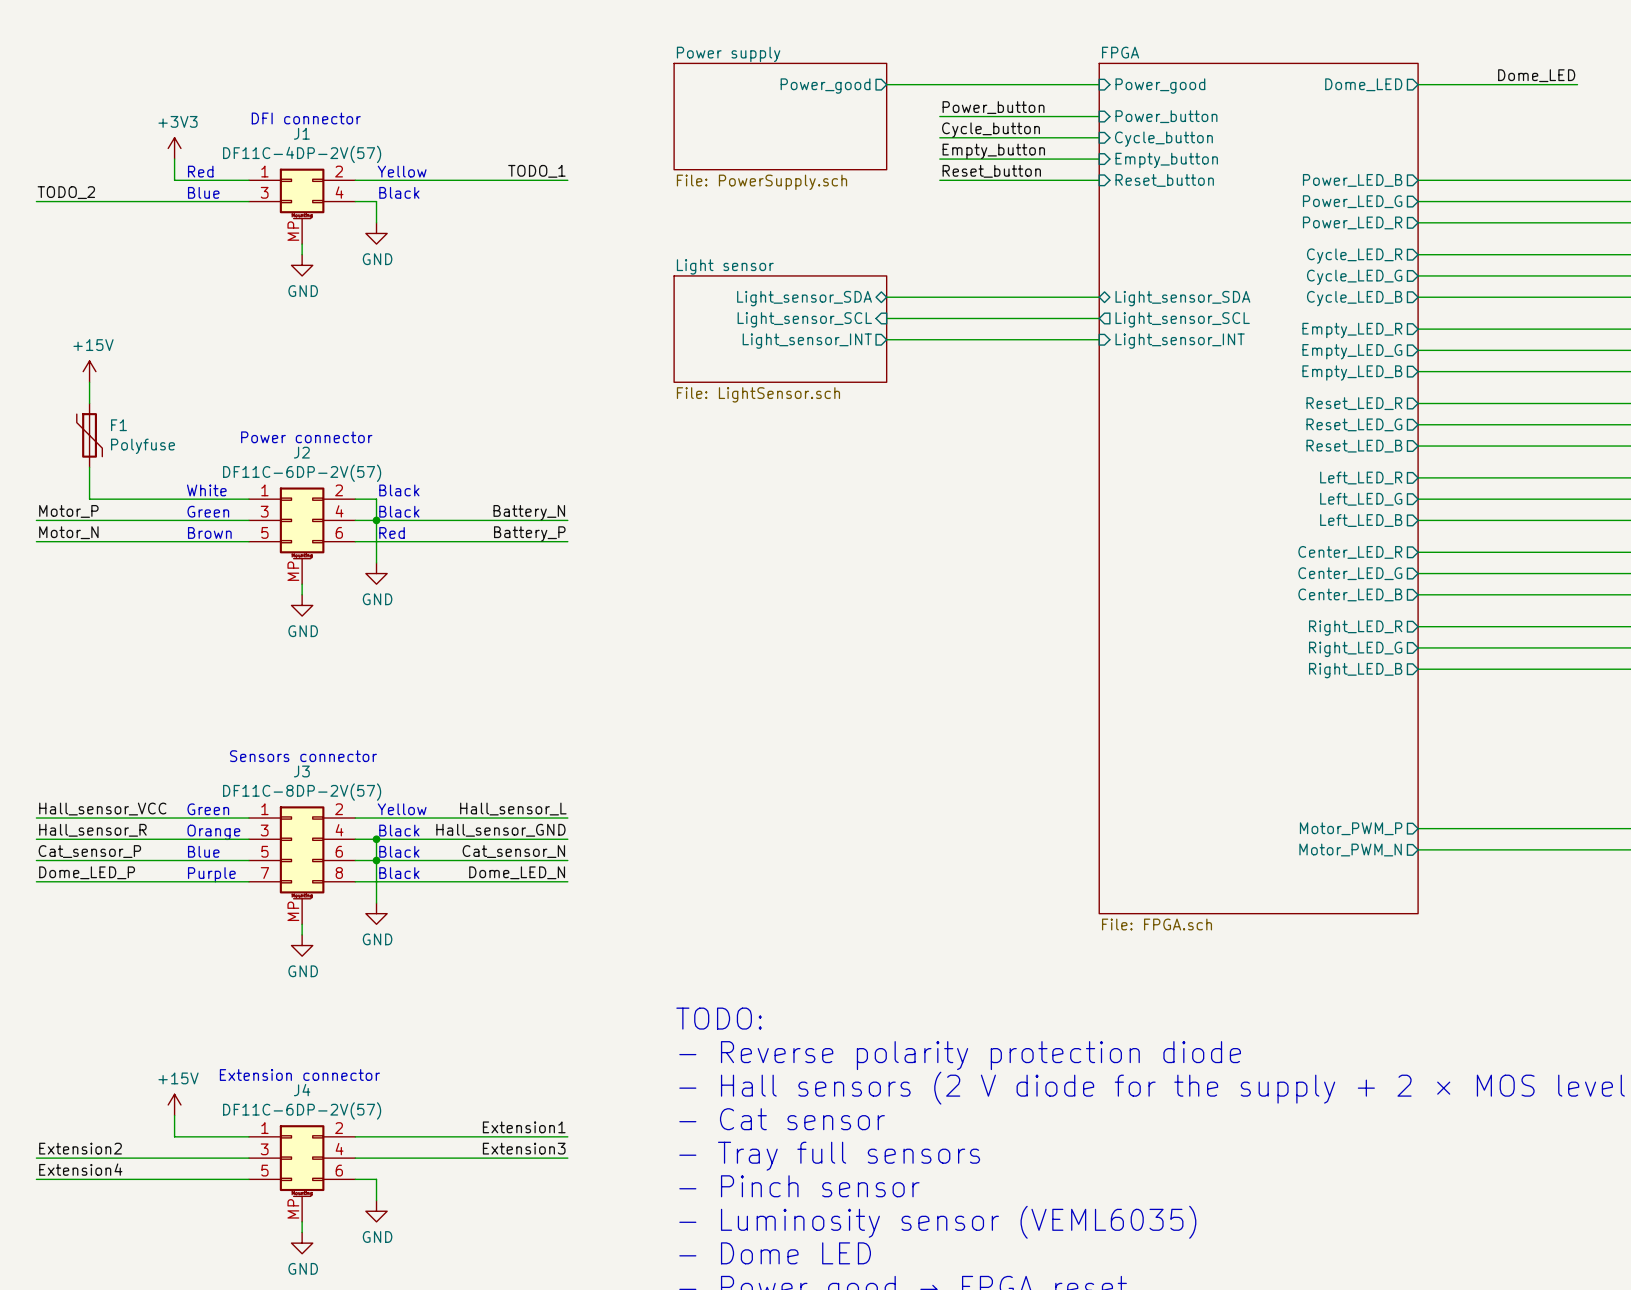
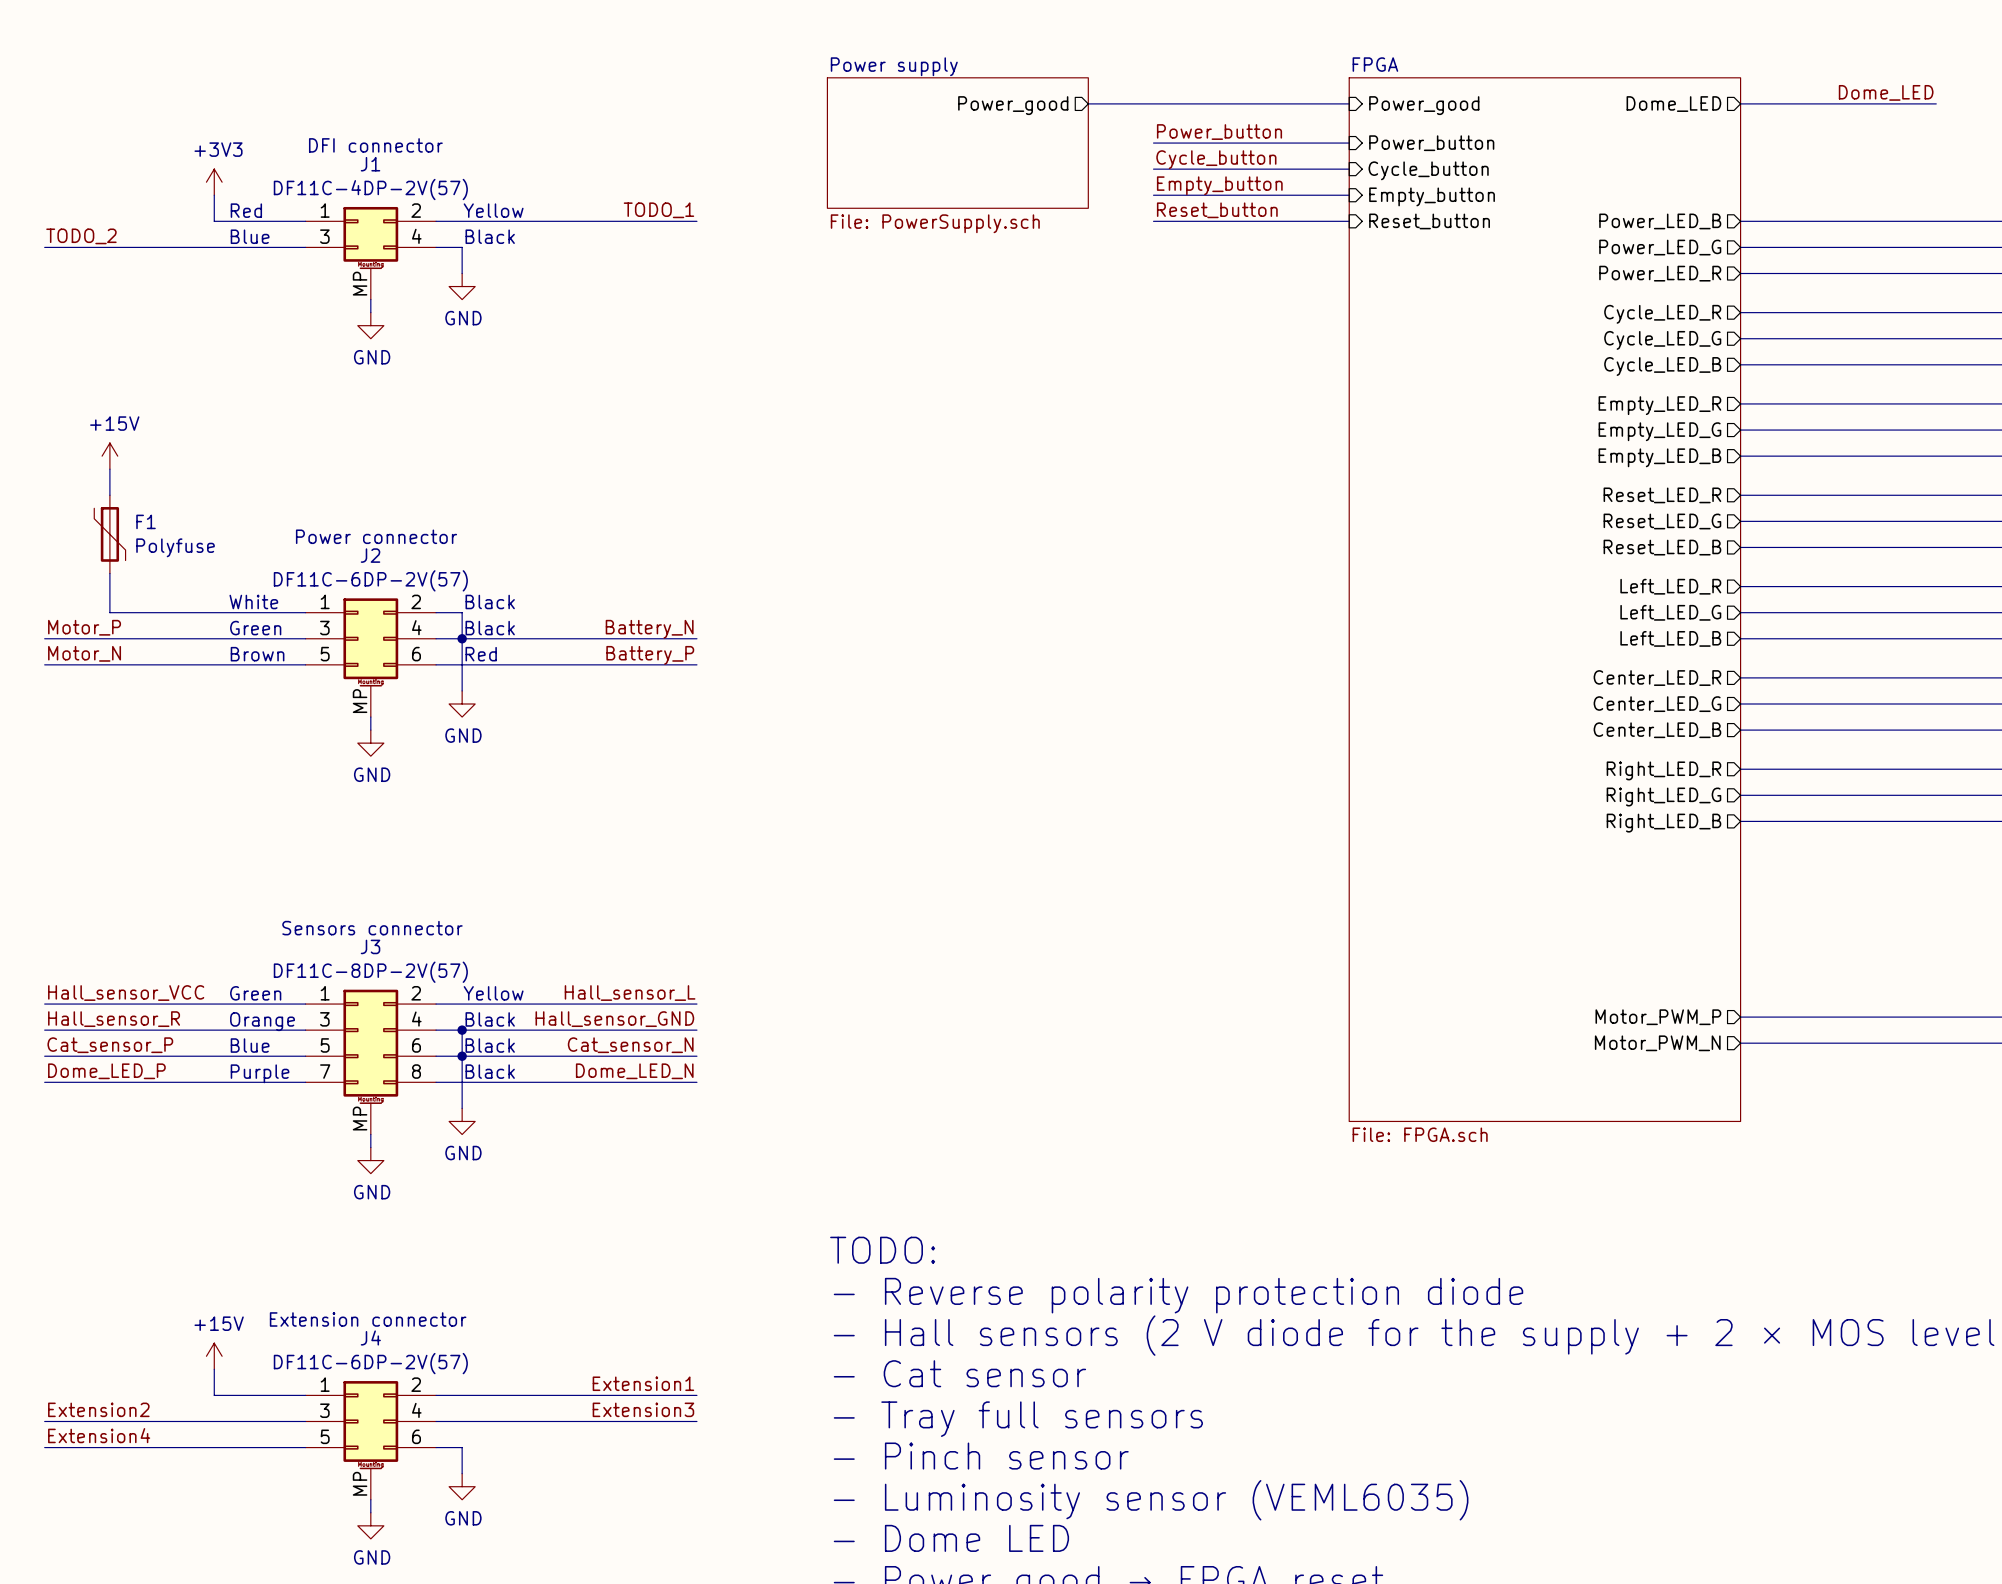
wire: (886, 297) (1099, 297) -> none
sheet pin: Light_sensor_SDA (804, 298) -> none
sheet pin: Light_sensor_SDA (1182, 298) -> none
wire: (886, 318) (1099, 318) -> none
sheet pin: Light_sensor_SCL (804, 319) -> none
sheet pin: Light_sensor_SCL (1182, 319) -> none
sheet Light sensor: File: LightSensor.sch (780, 329) -> none
wire: (886, 339) (1099, 339) -> none
sheet pin: Light_sensor_INT (807, 341) -> none
sheet pin: Light_sensor_INT (1180, 341) -> none

